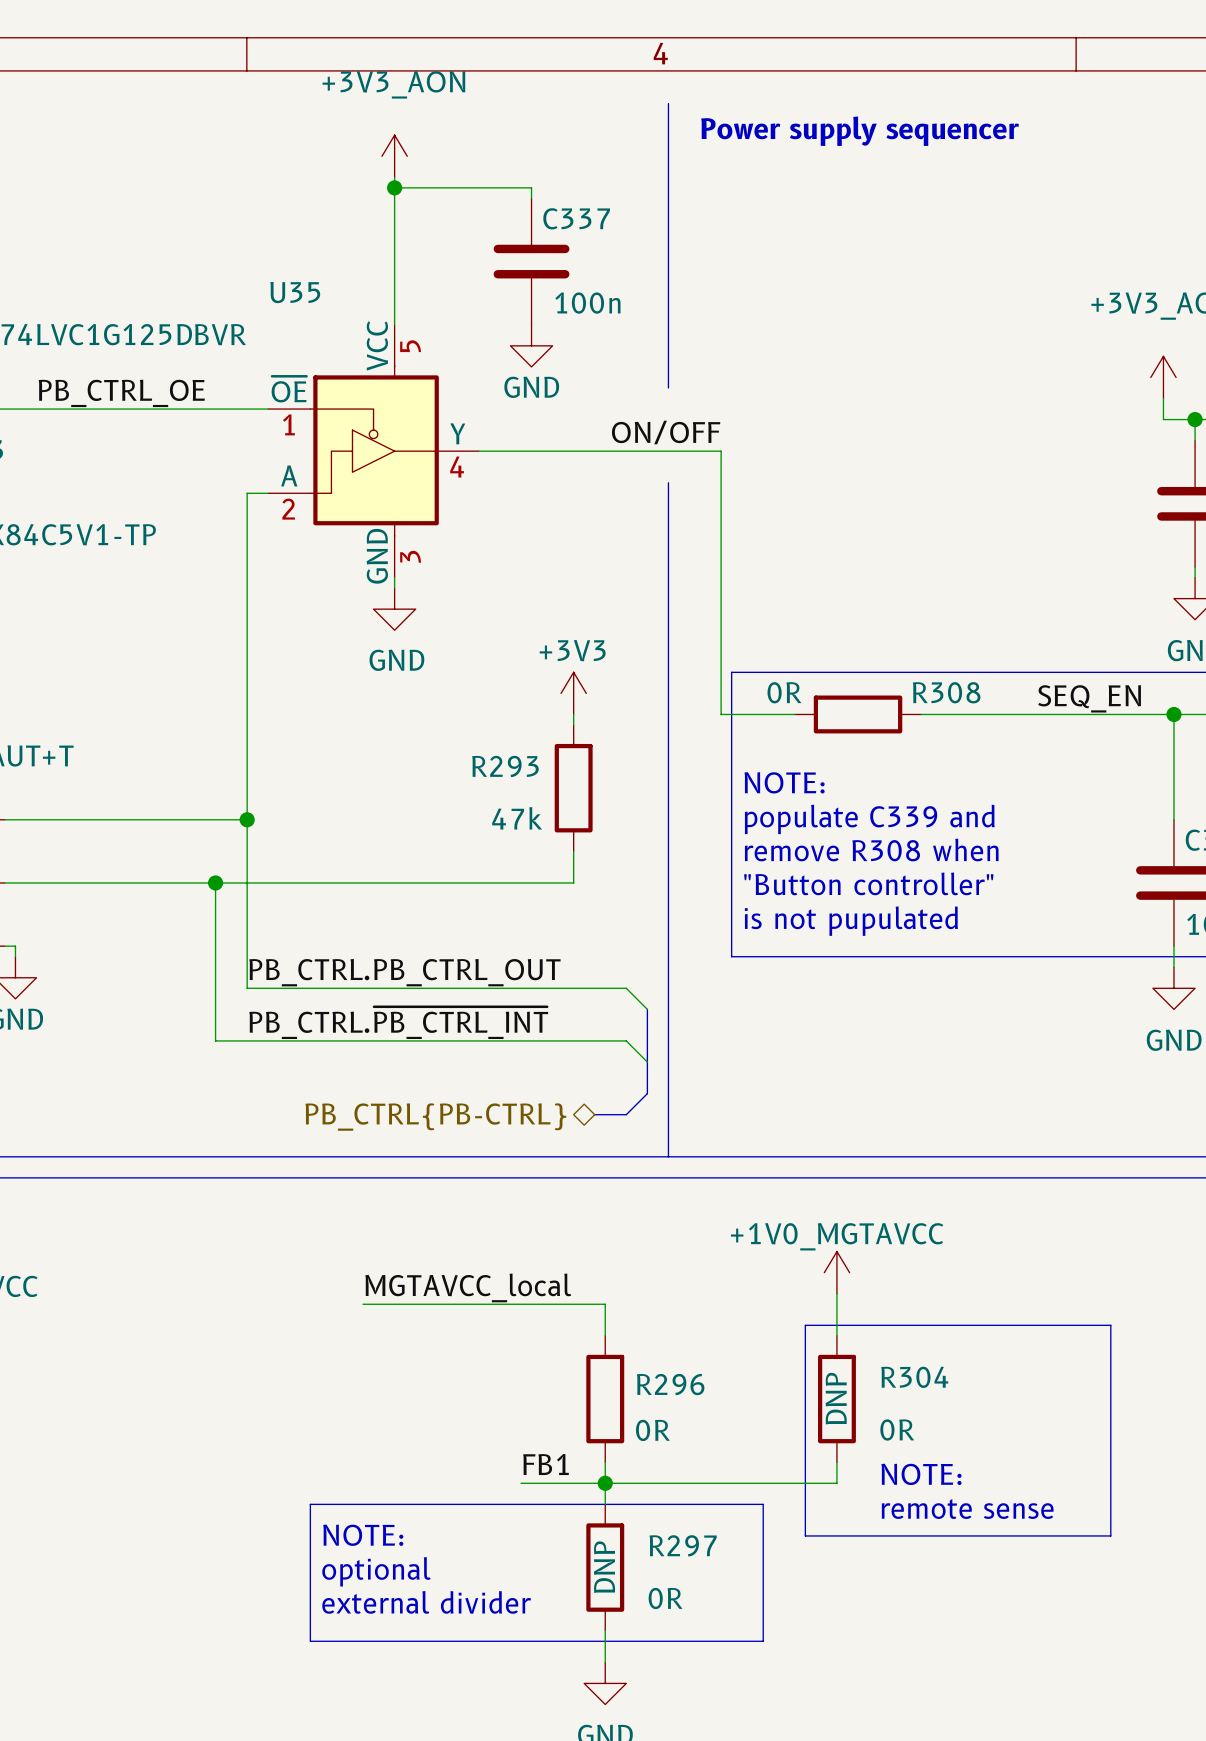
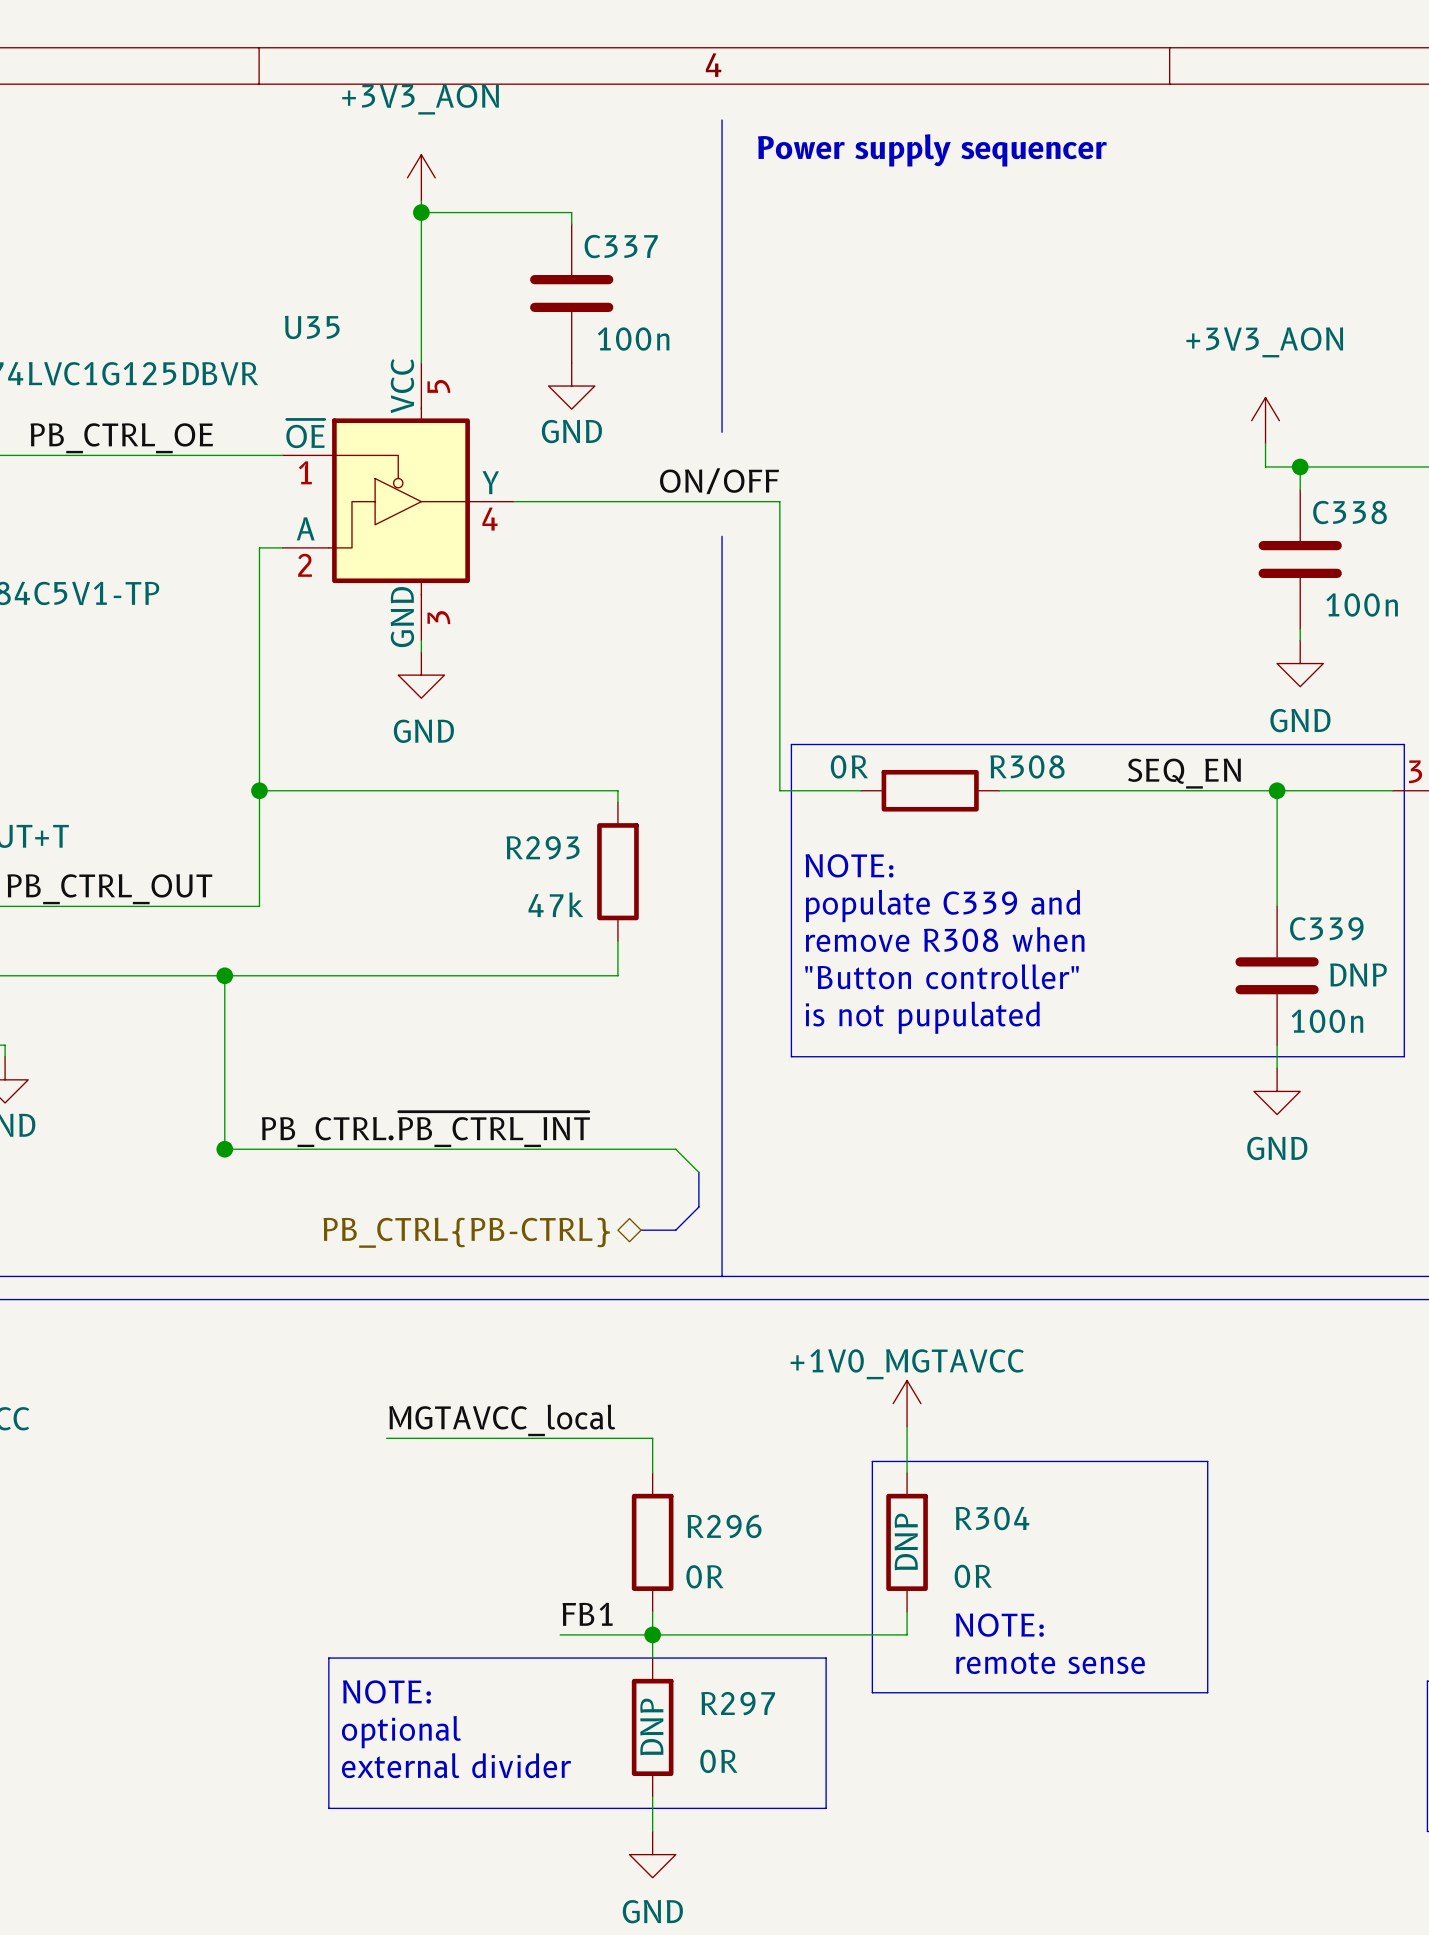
power symbol: +3V3 (573, 693) -> none
wire: none -> (259, 790) (617, 790)
junction: none -> (259, 790)
label: none -> PB_CTRL_OUT (109, 889)
wire: (247, 819) (247, 988) (626, 988) (647, 1009) -> none
junction: (247, 819) -> none
label: PB_CTRL.PB_CTRL_OUT (404, 972) -> none
bus: (647, 1009) (647, 1062) -> none
junction: none -> (224, 1149)

